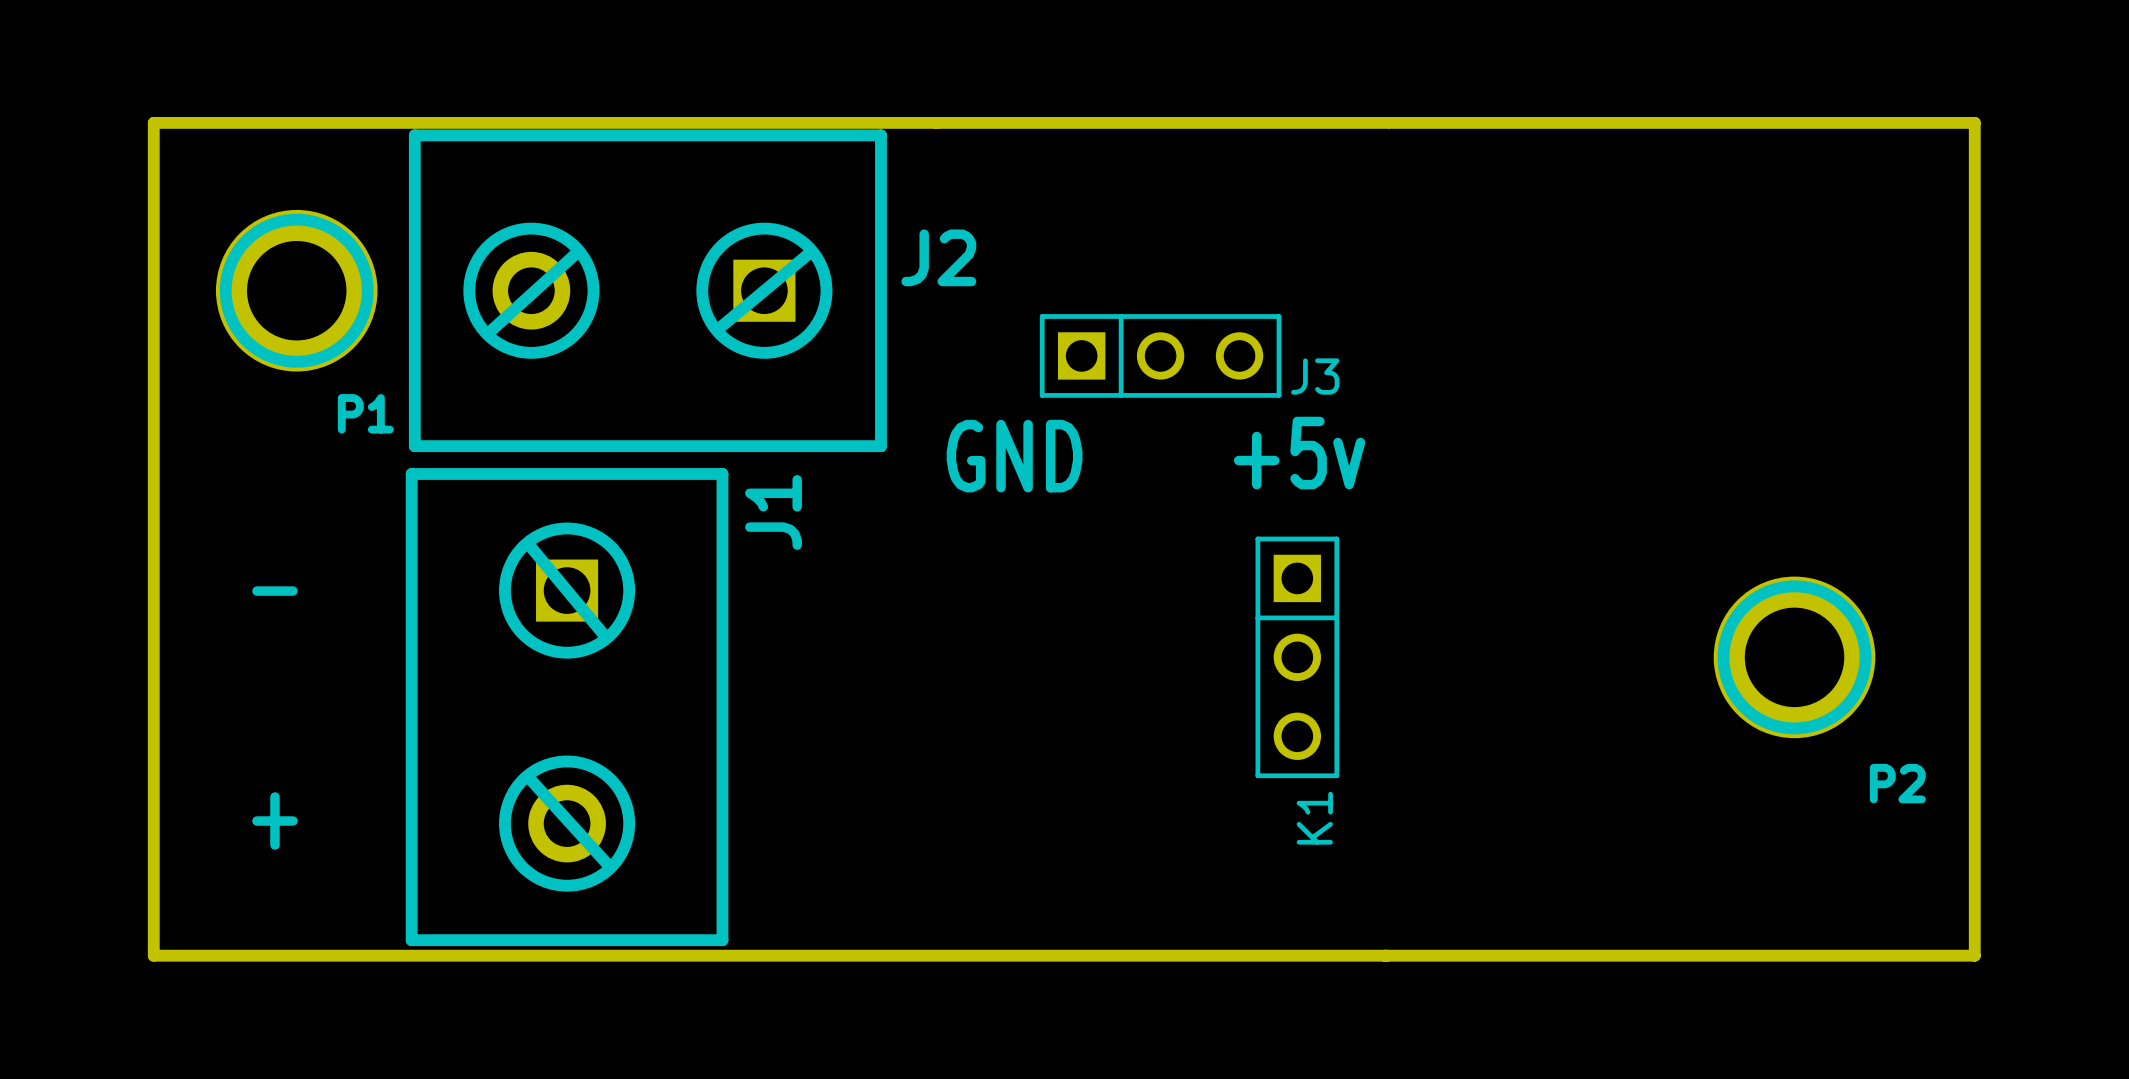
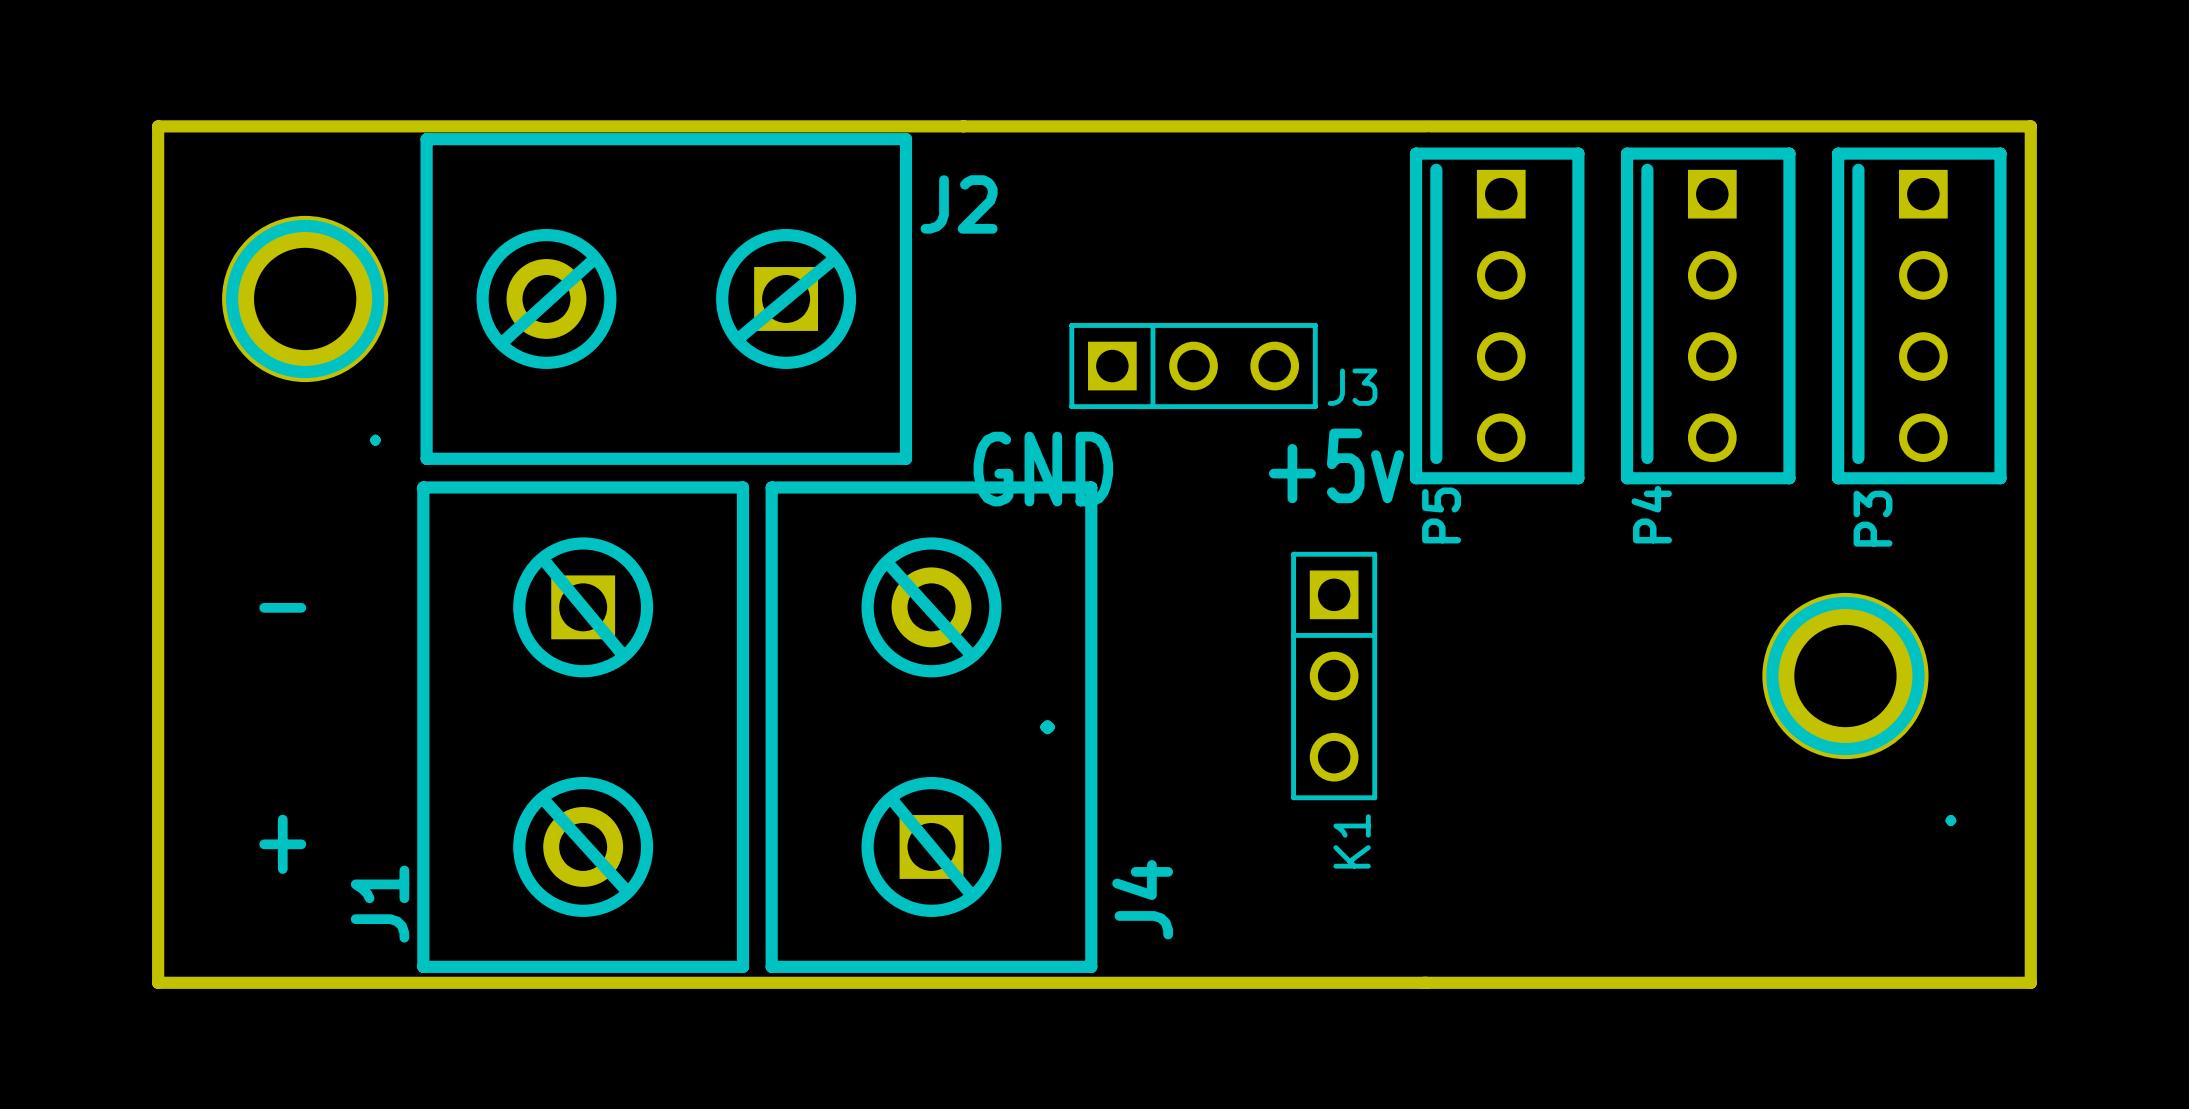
J2 name position: J2 (938, 257) -> J2 (959, 204)
P5: none -> (1497, 315)
P4: none -> (1708, 315)
P3: none -> (1919, 315)
P1 name: P1 (365, 413) -> . (375, 440)
J1 name position: J1 (773, 512) -> J1 (380, 904)
J4: none -> . (931, 727)
P2 name: P2 (1897, 783) -> . (1950, 820)

